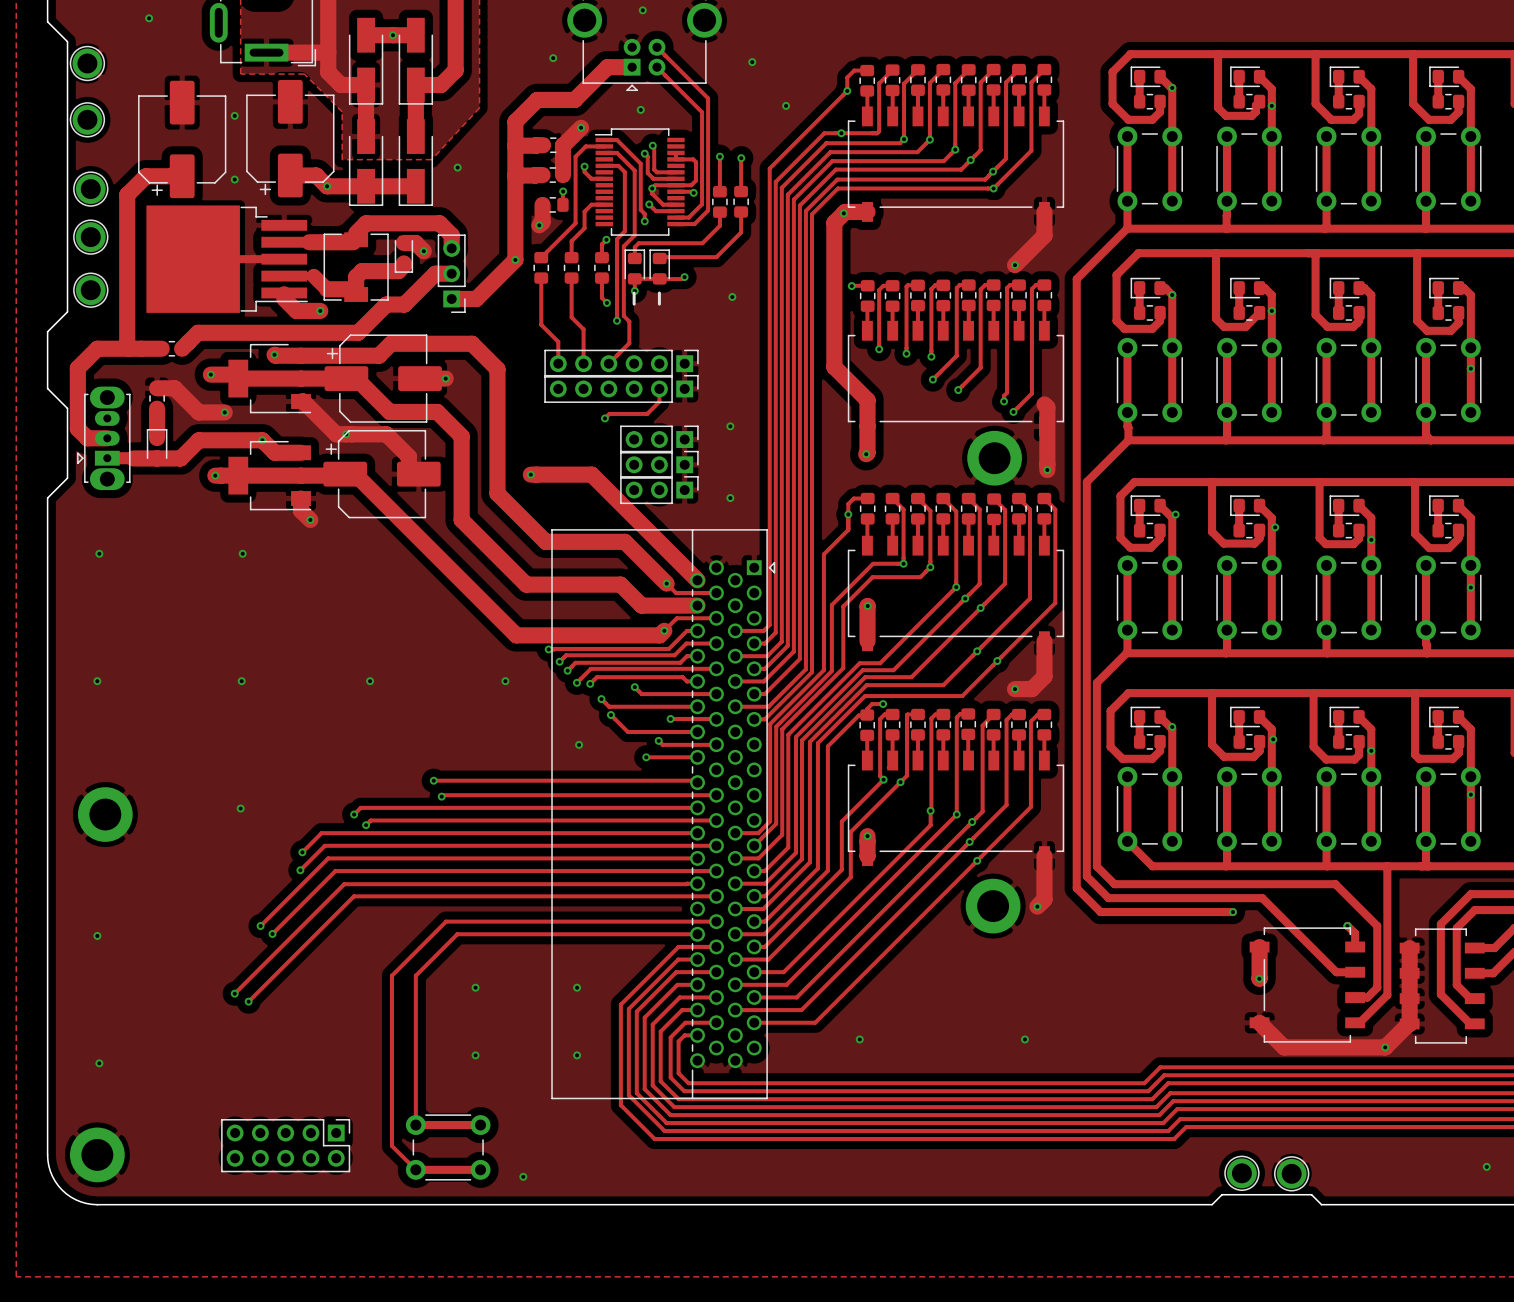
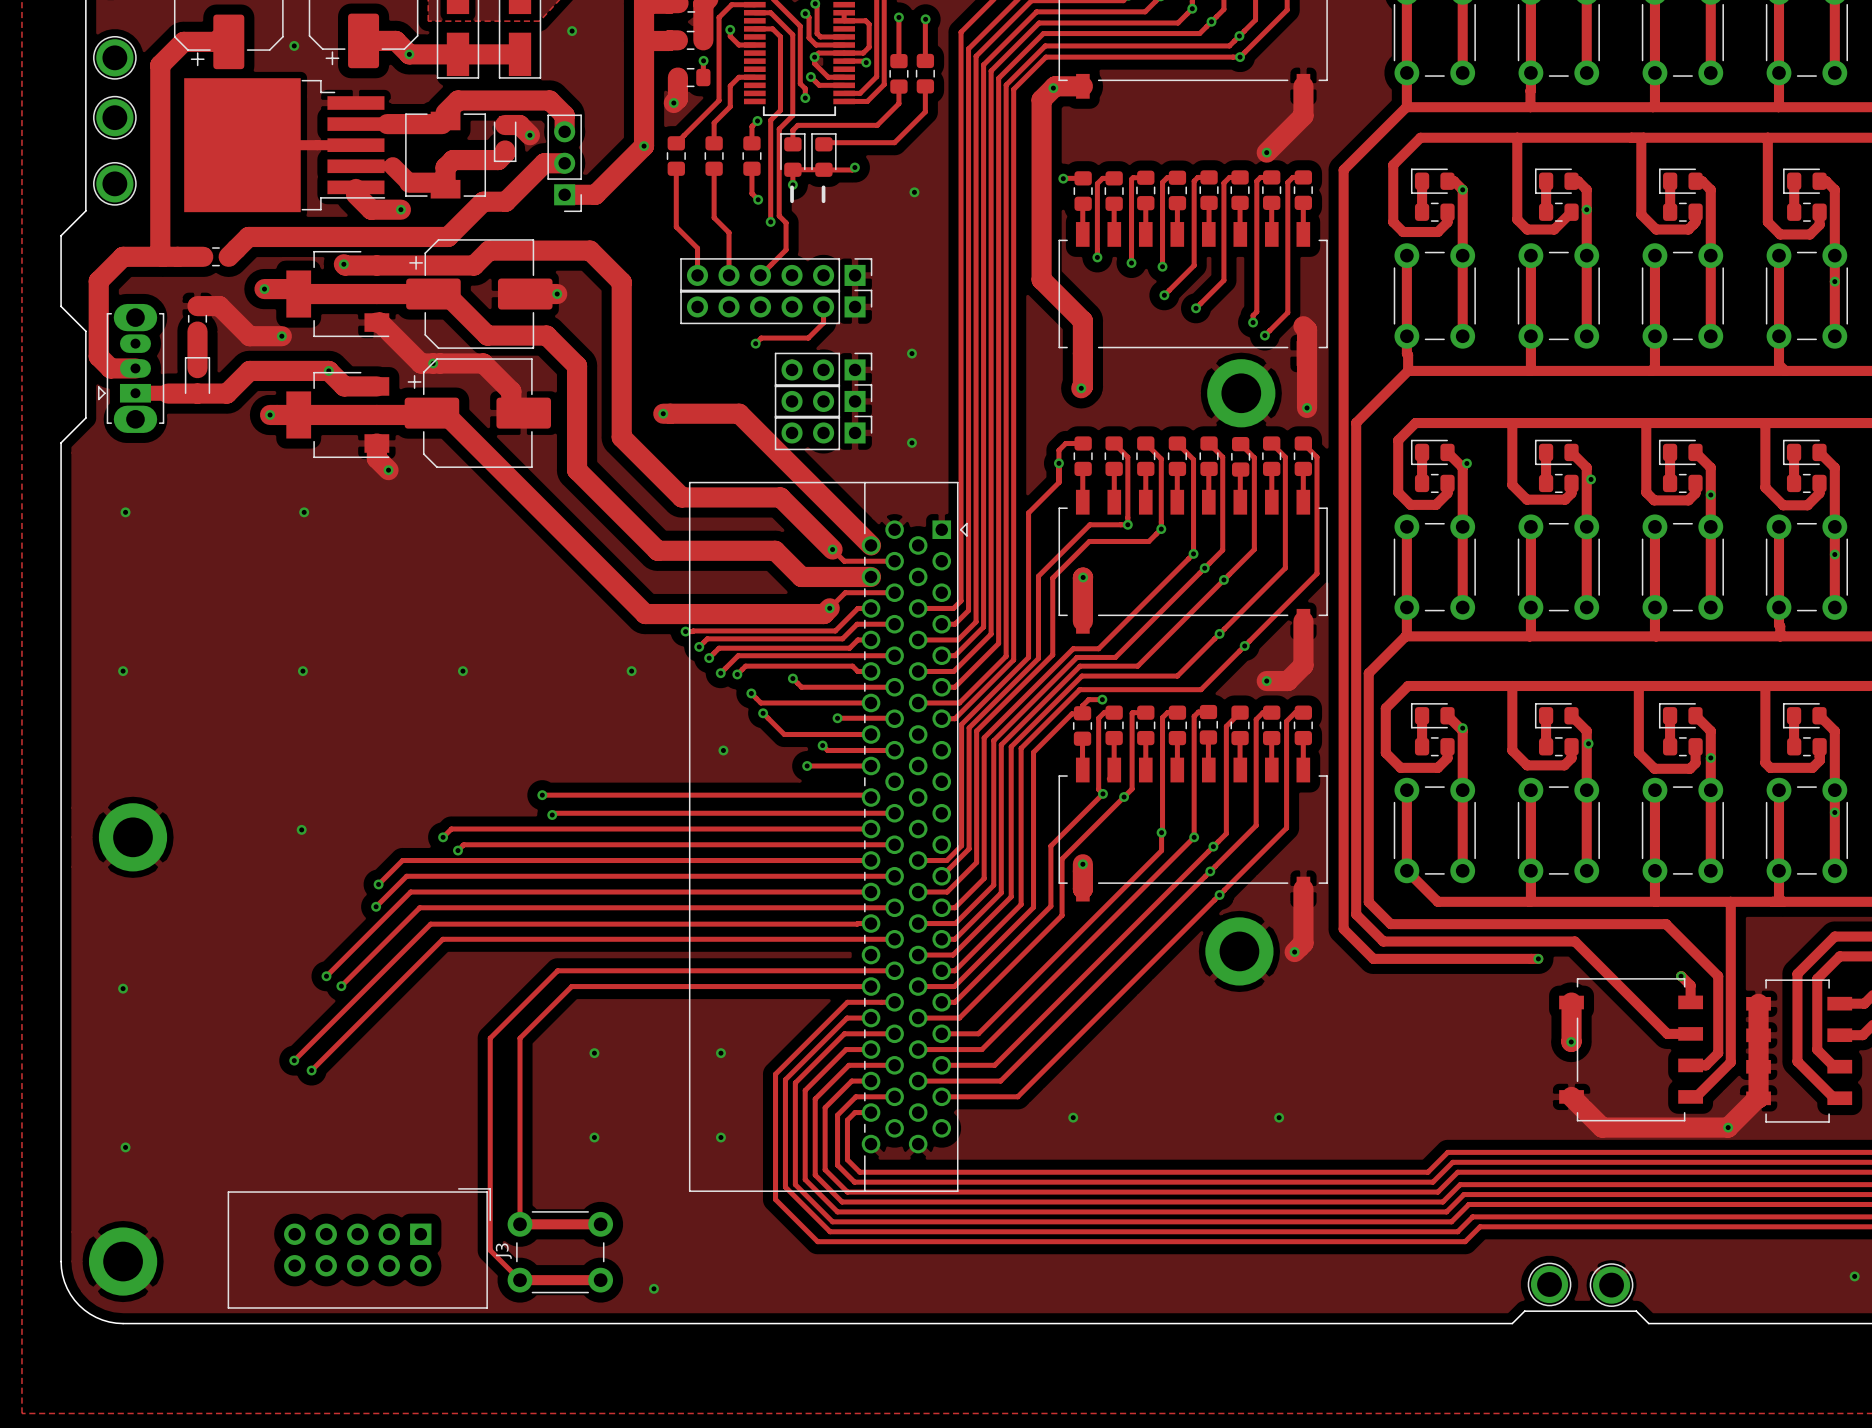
J3: none -> (359, 1248)
part: (285, 1145) -> none

